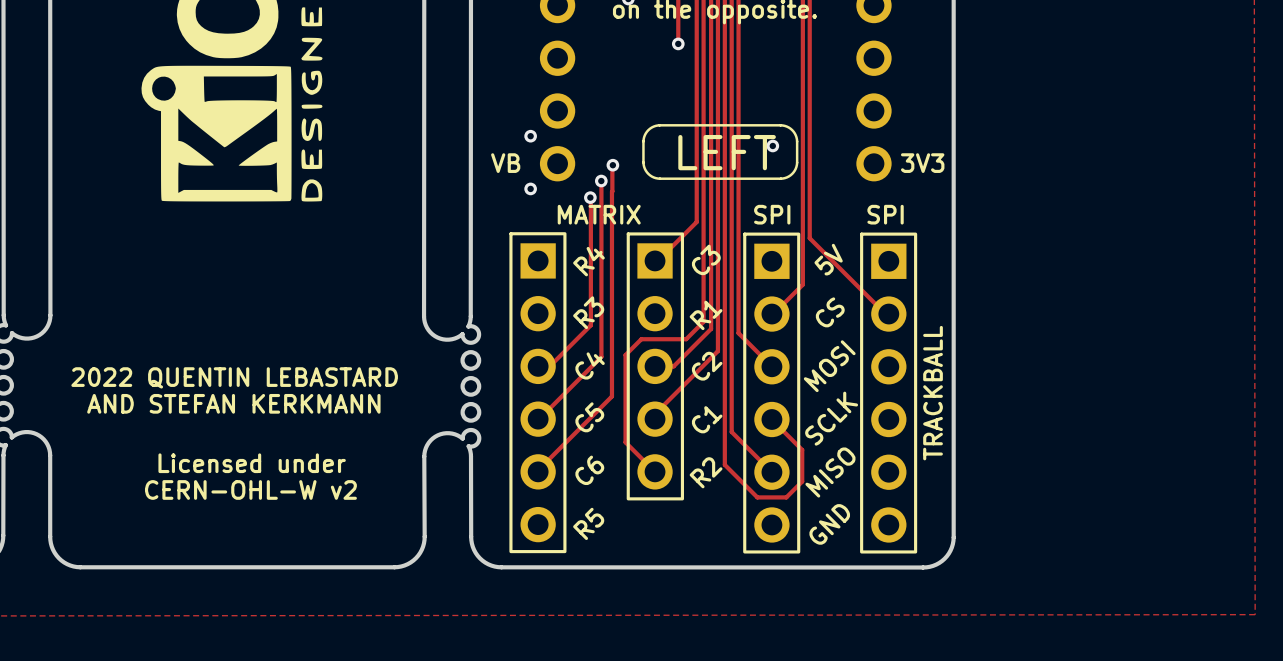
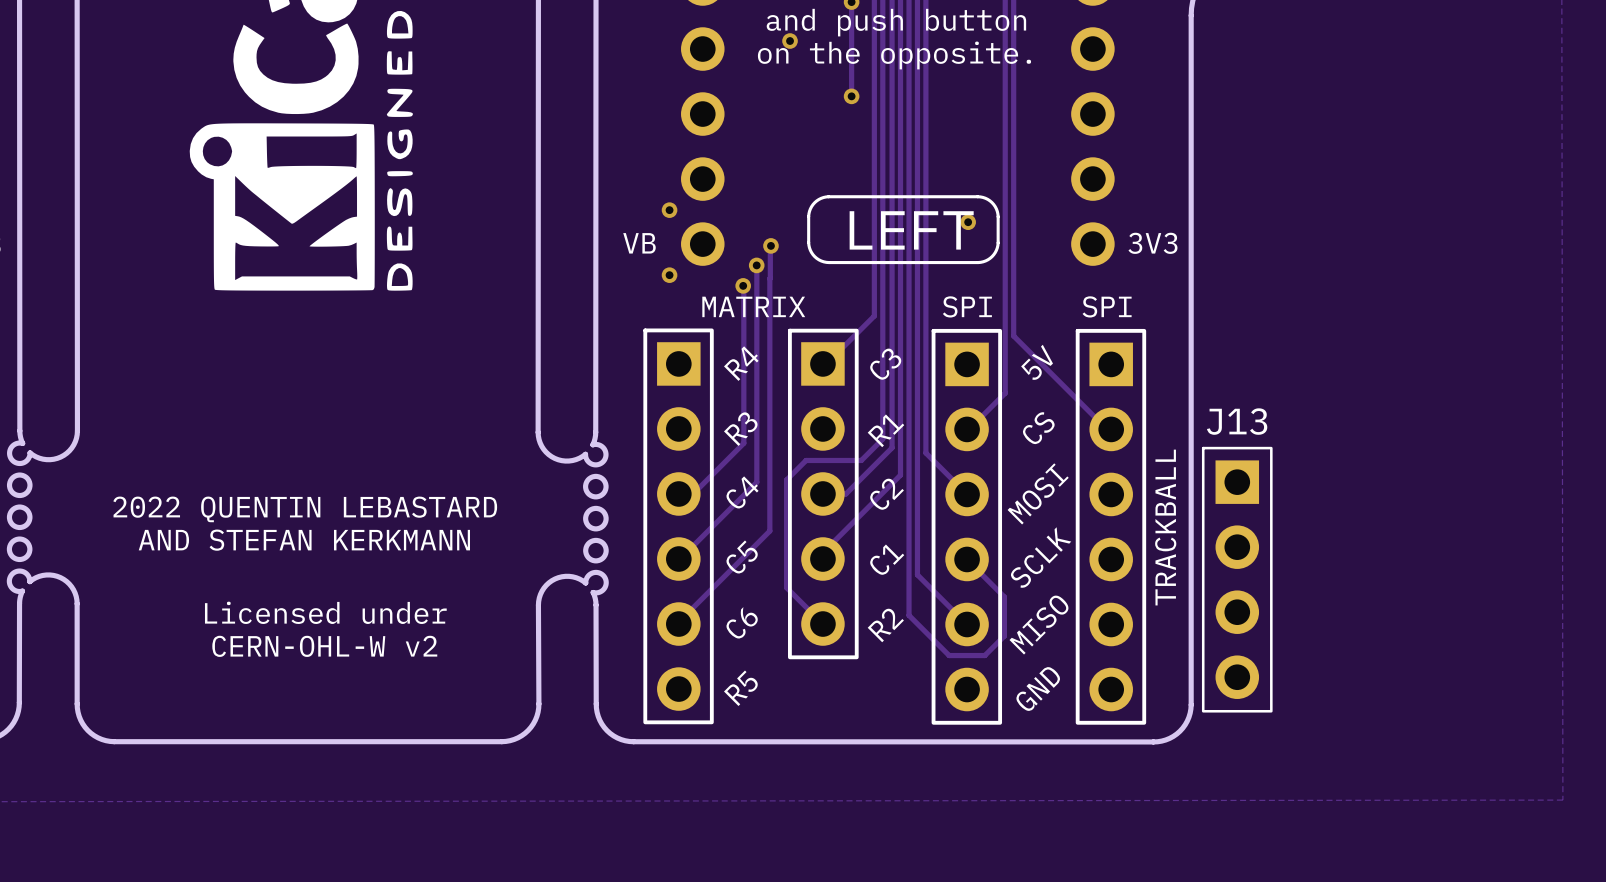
J13: none -> (1237, 579)

